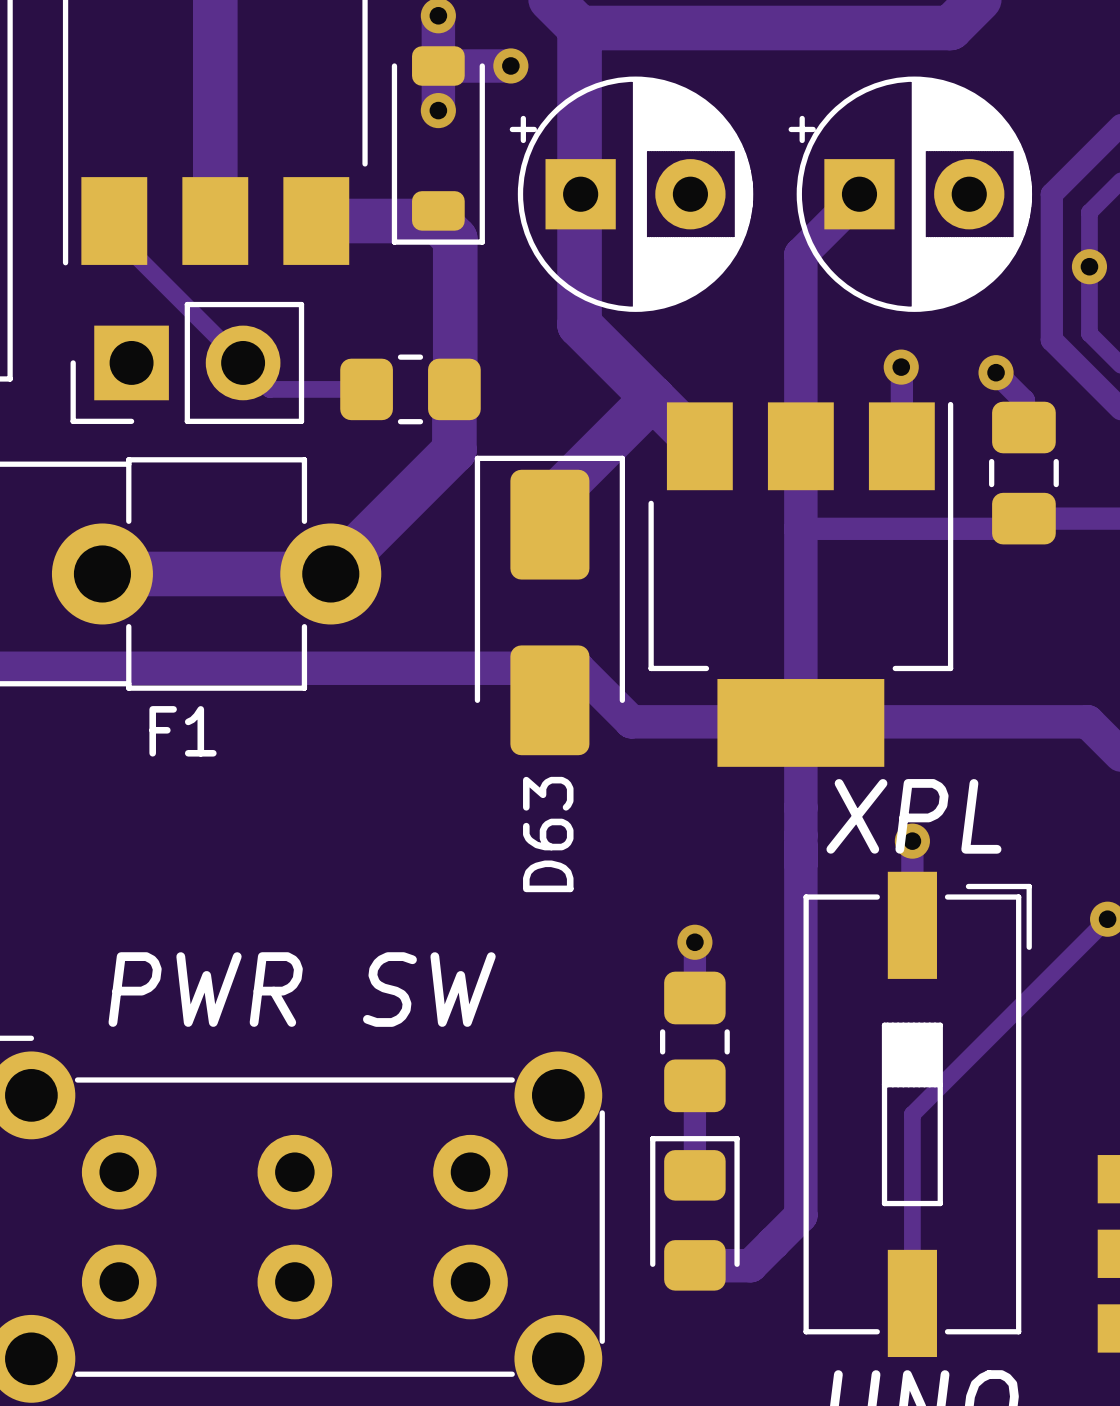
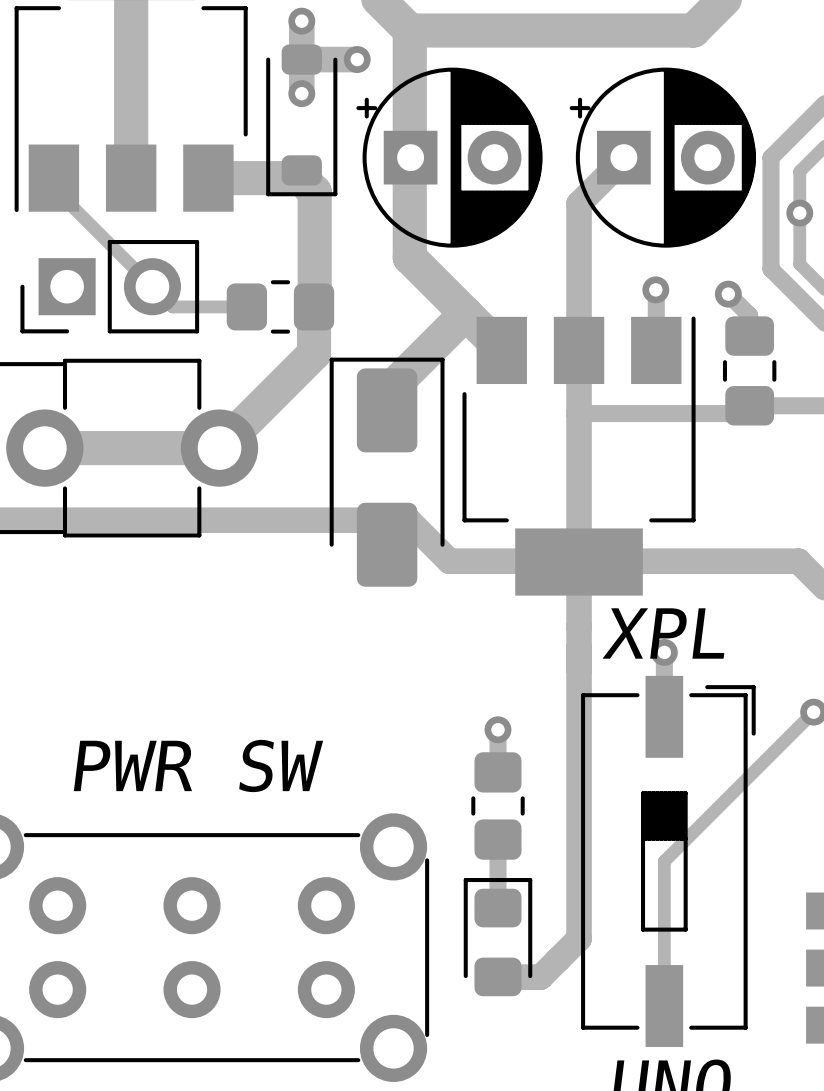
F1 name: F1 (183, 731) -> none
D63 name: D63 (548, 834) -> none

